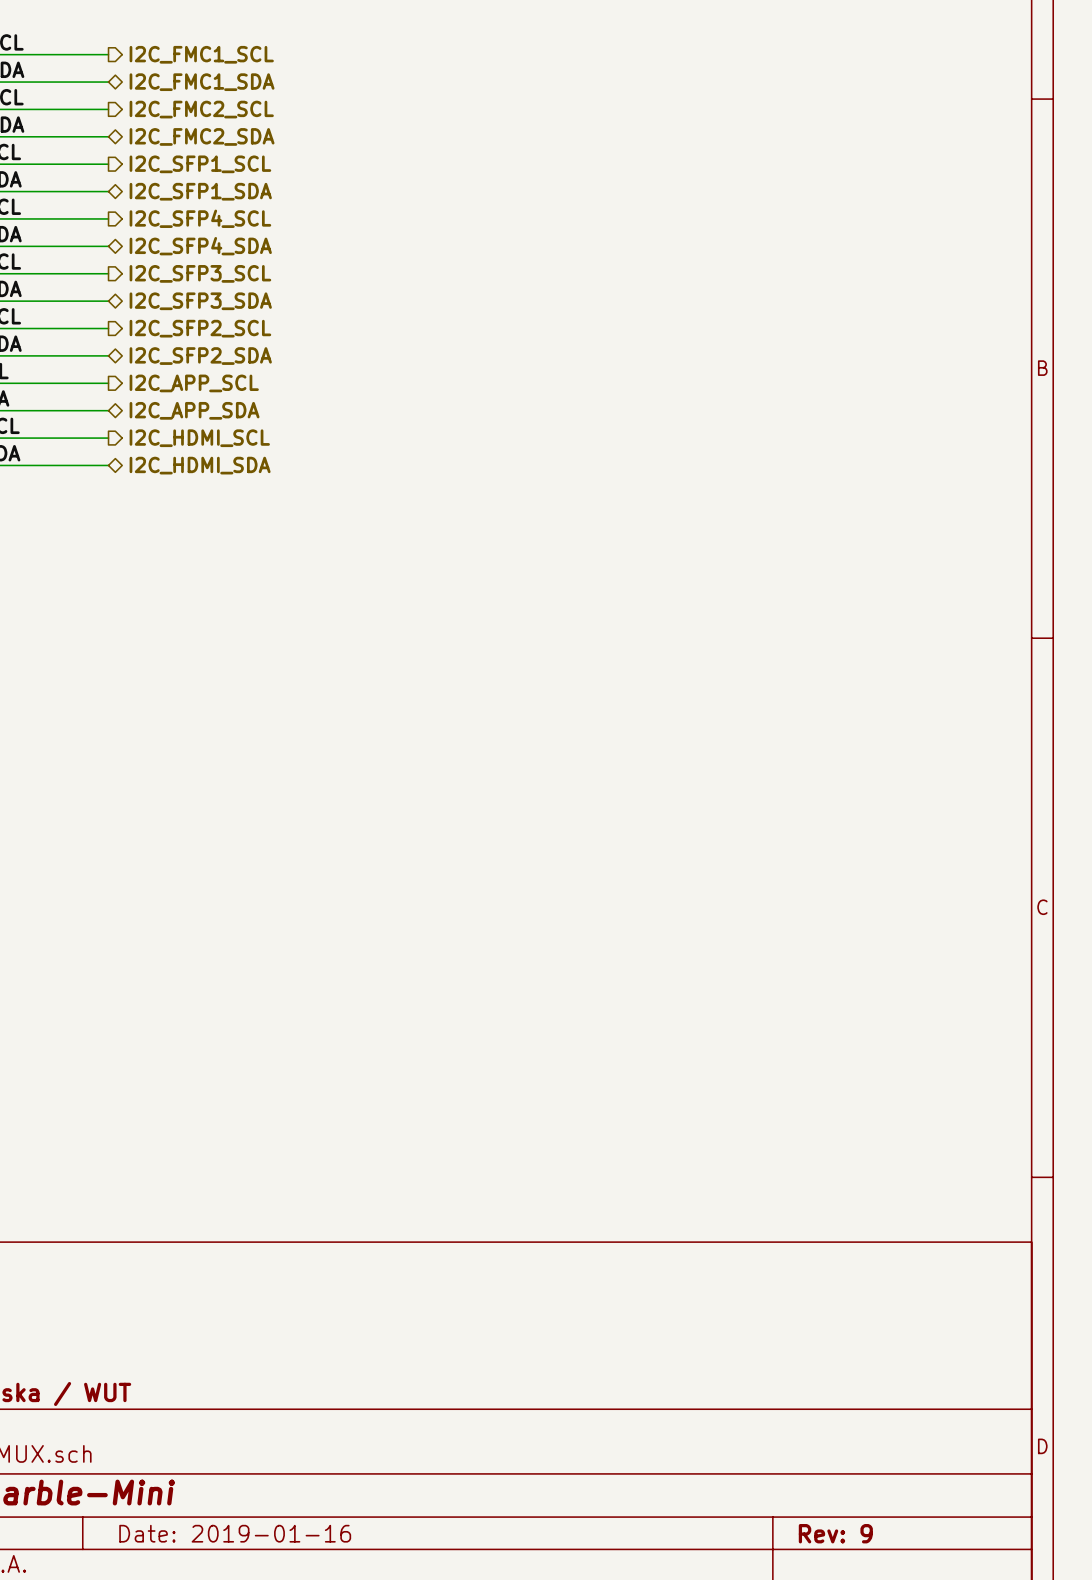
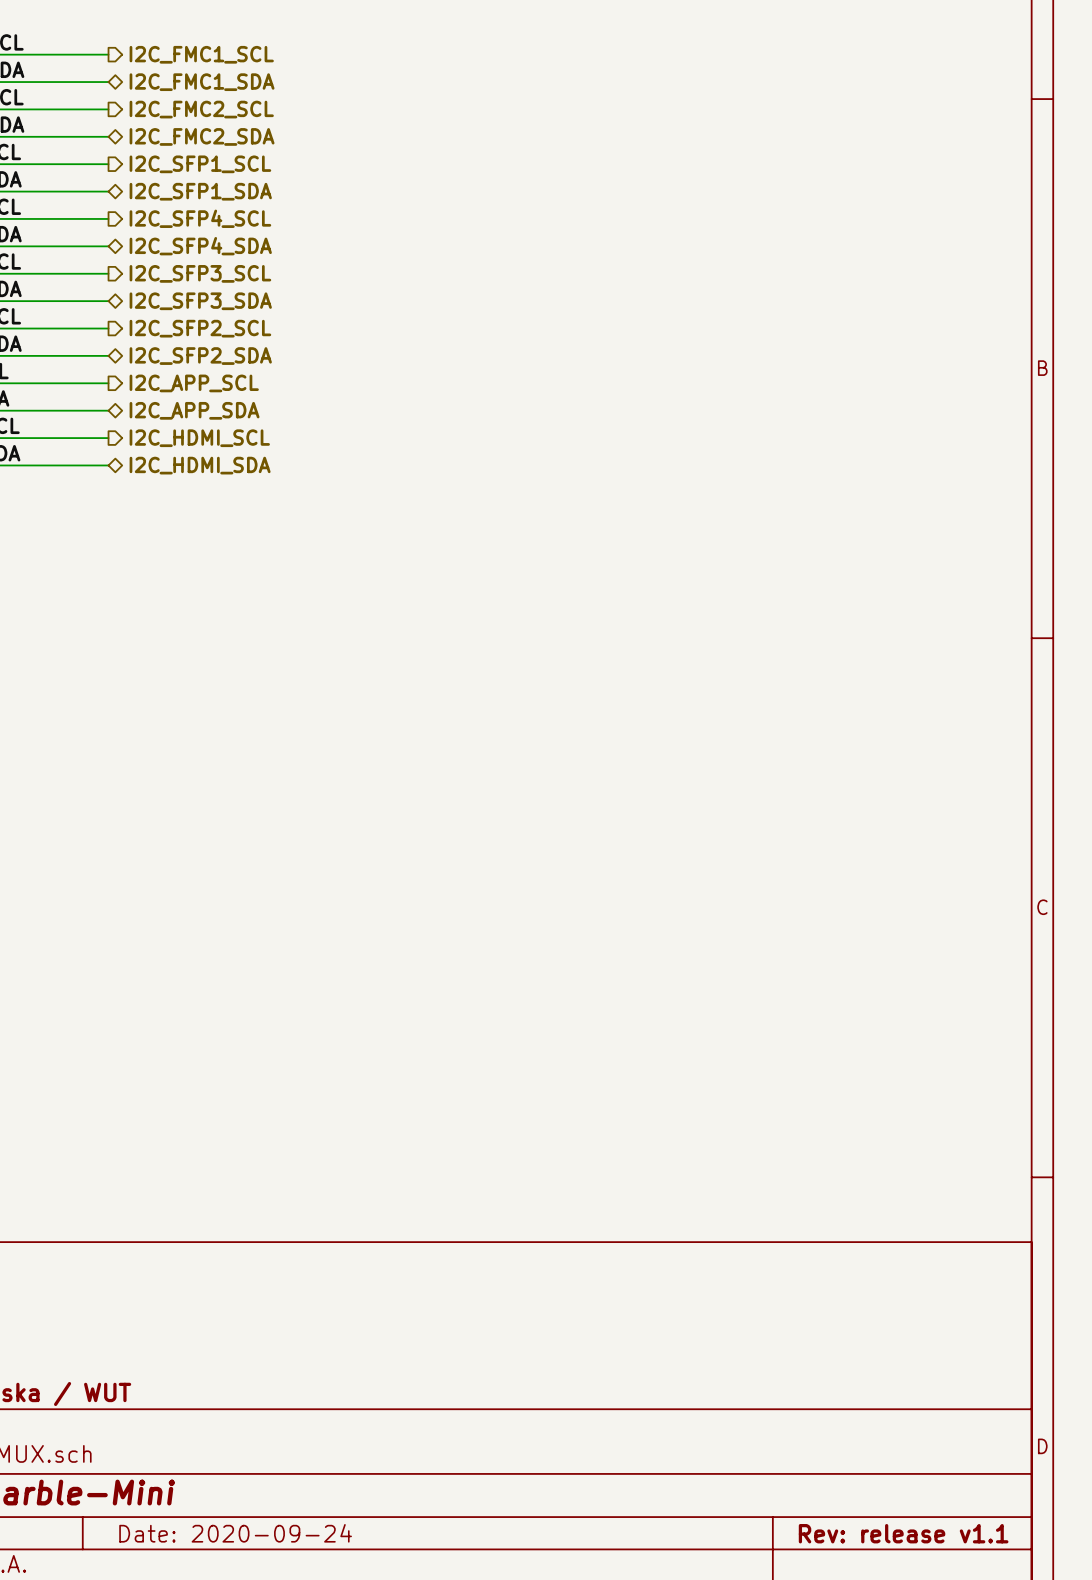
title block: Date: 2019-01-16 (235, 1533) -> Date: 2020-09-24 (235, 1533)
title block: Rev: 9 (835, 1533) -> Rev: release v1.1 (903, 1533)

